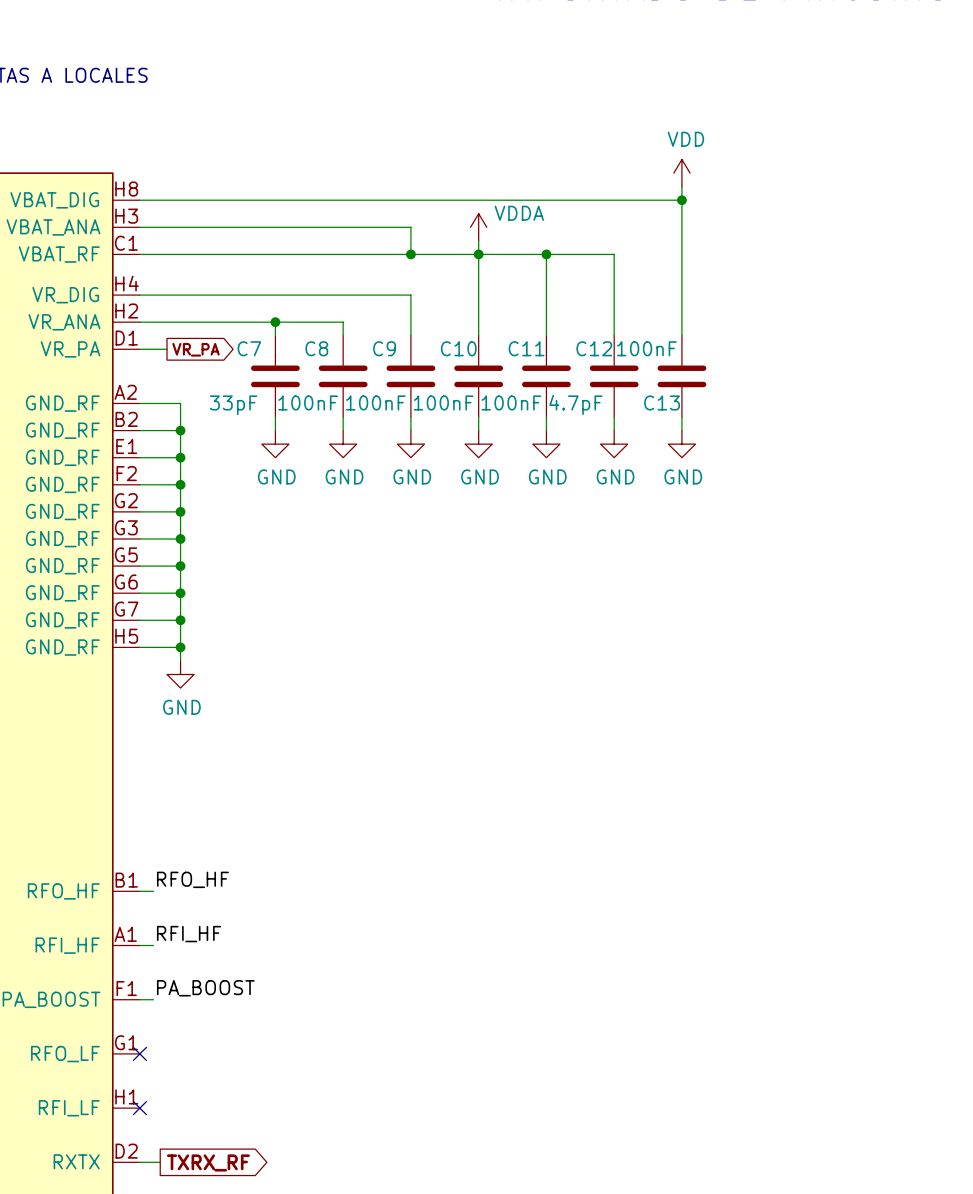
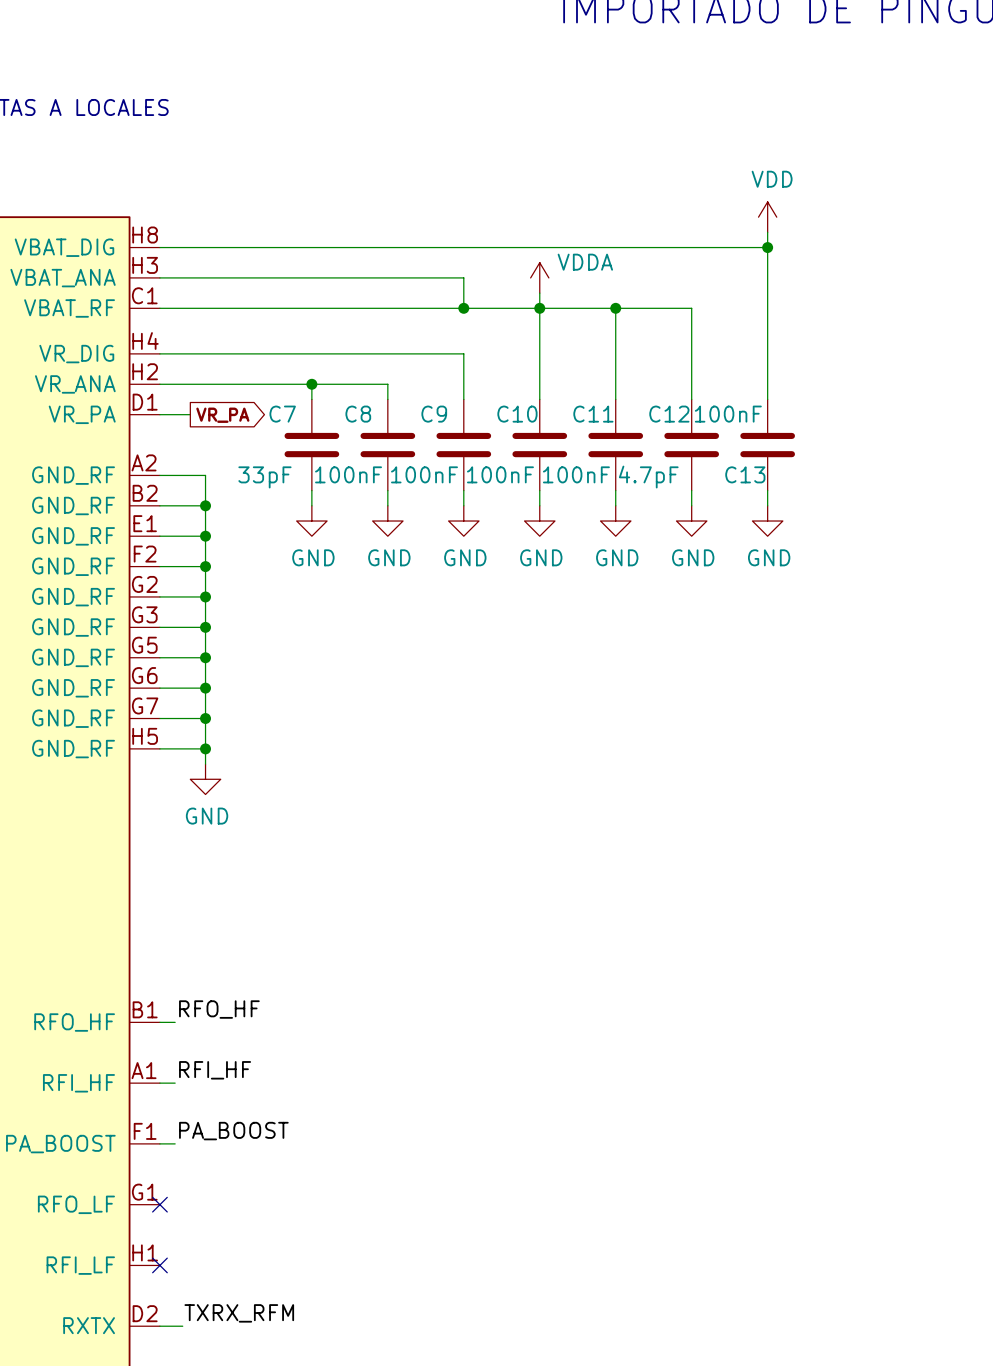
label: none -> TXRX_RFM (239, 1313)
global label: TXRX_RF (208, 1162) -> none

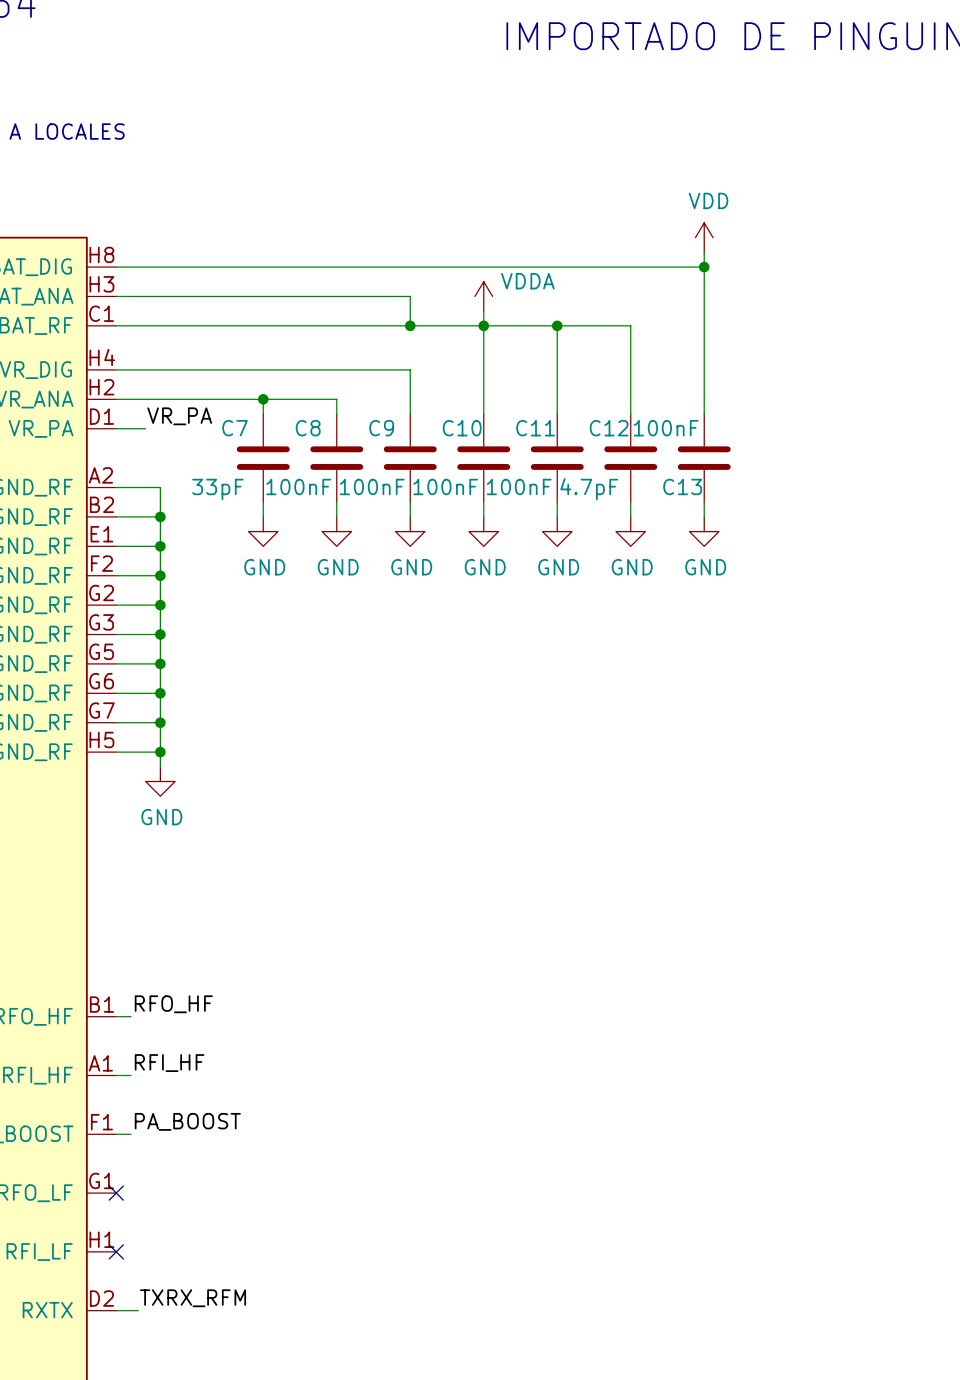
label: none -> VR_PA (179, 416)
global label: VR_PA (222, 415) -> none

